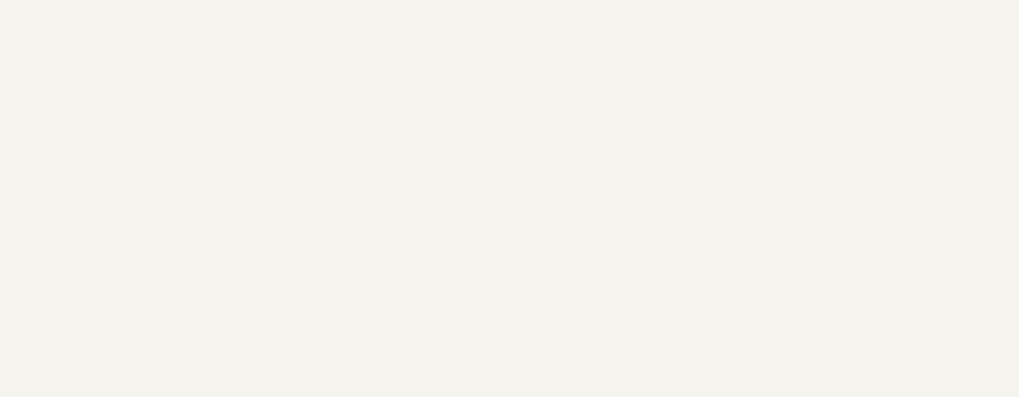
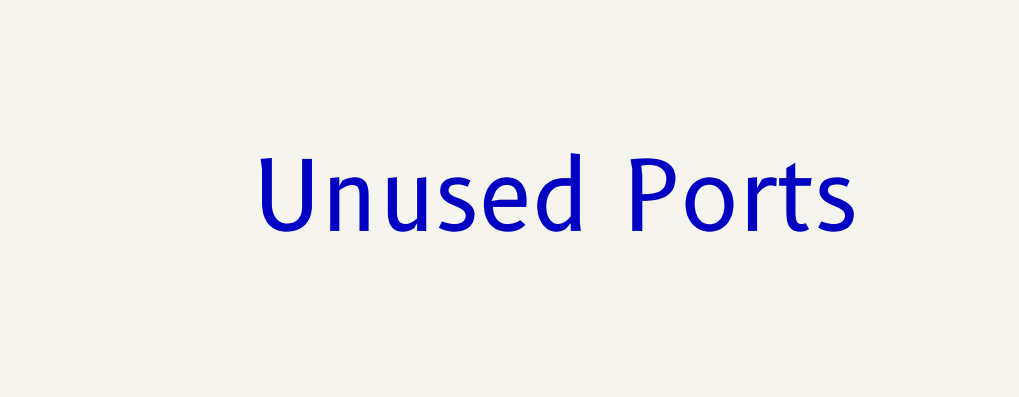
text: none -> Unused Ports (557, 192)

